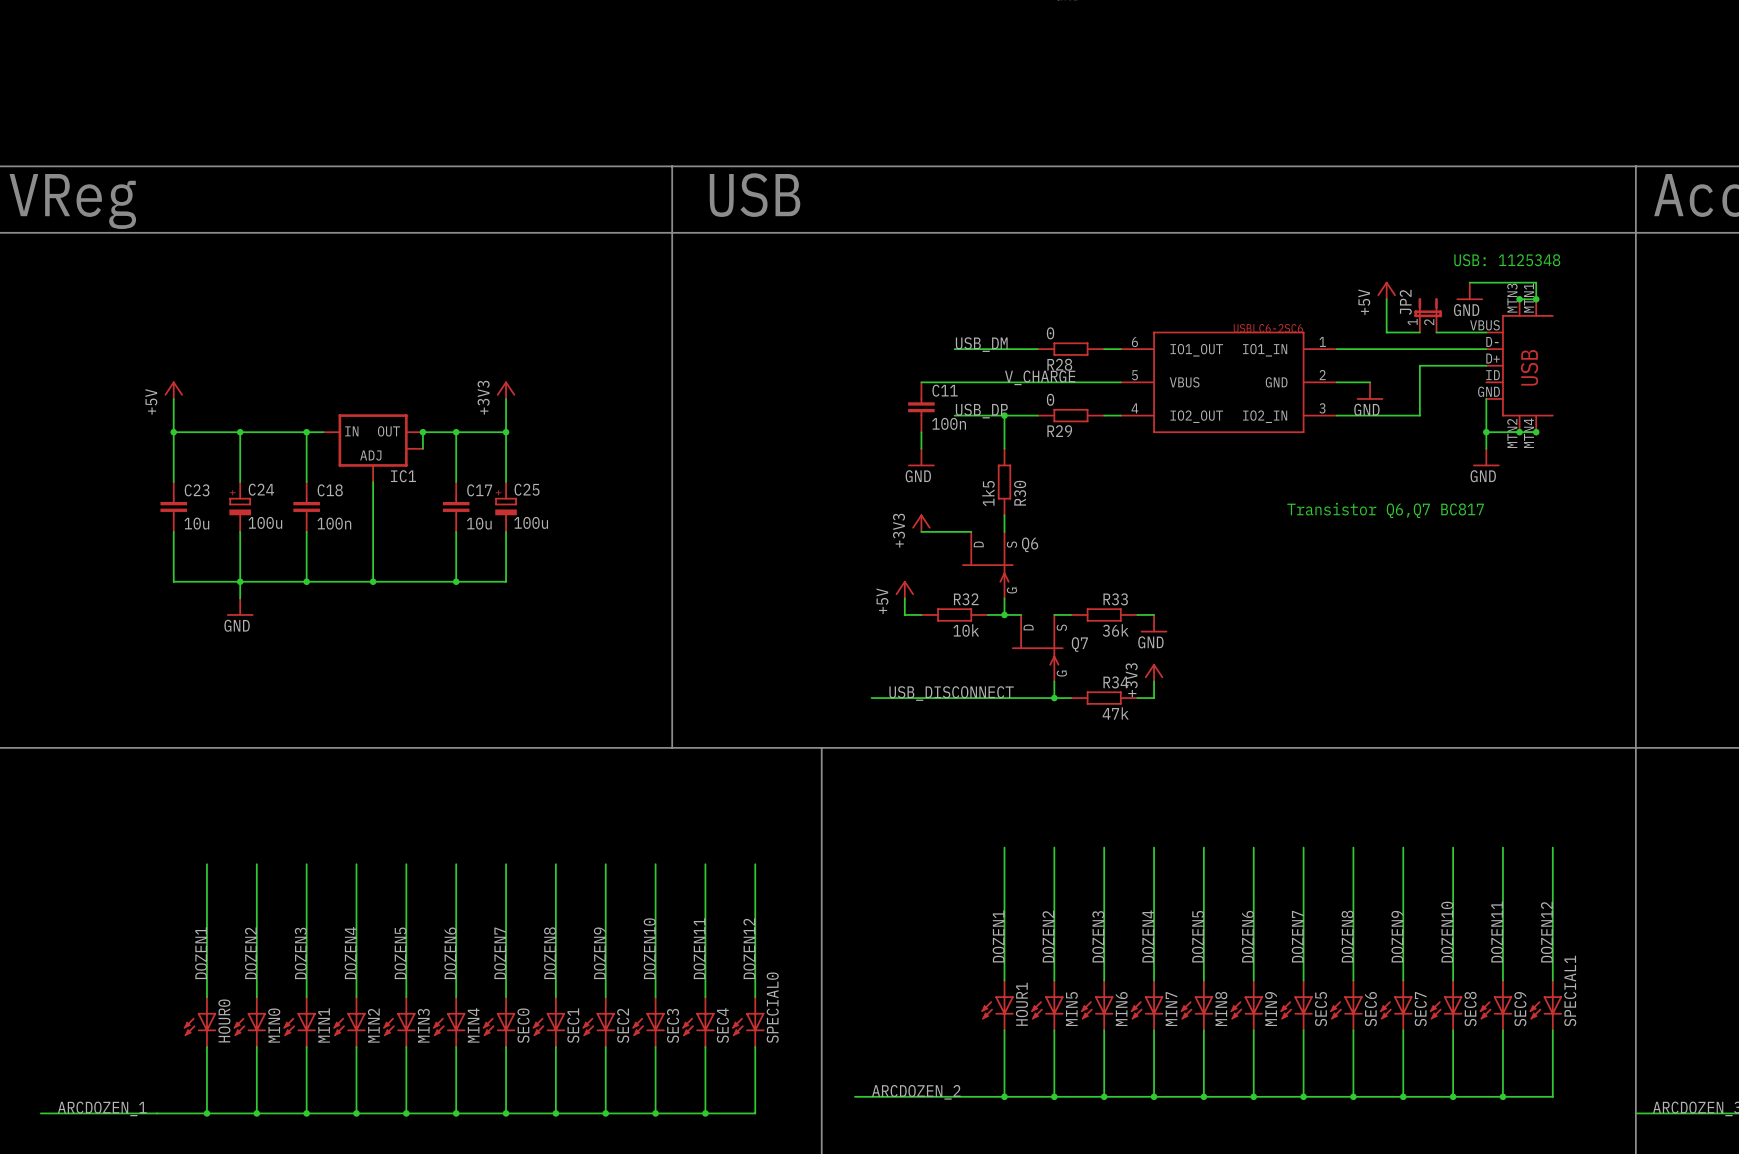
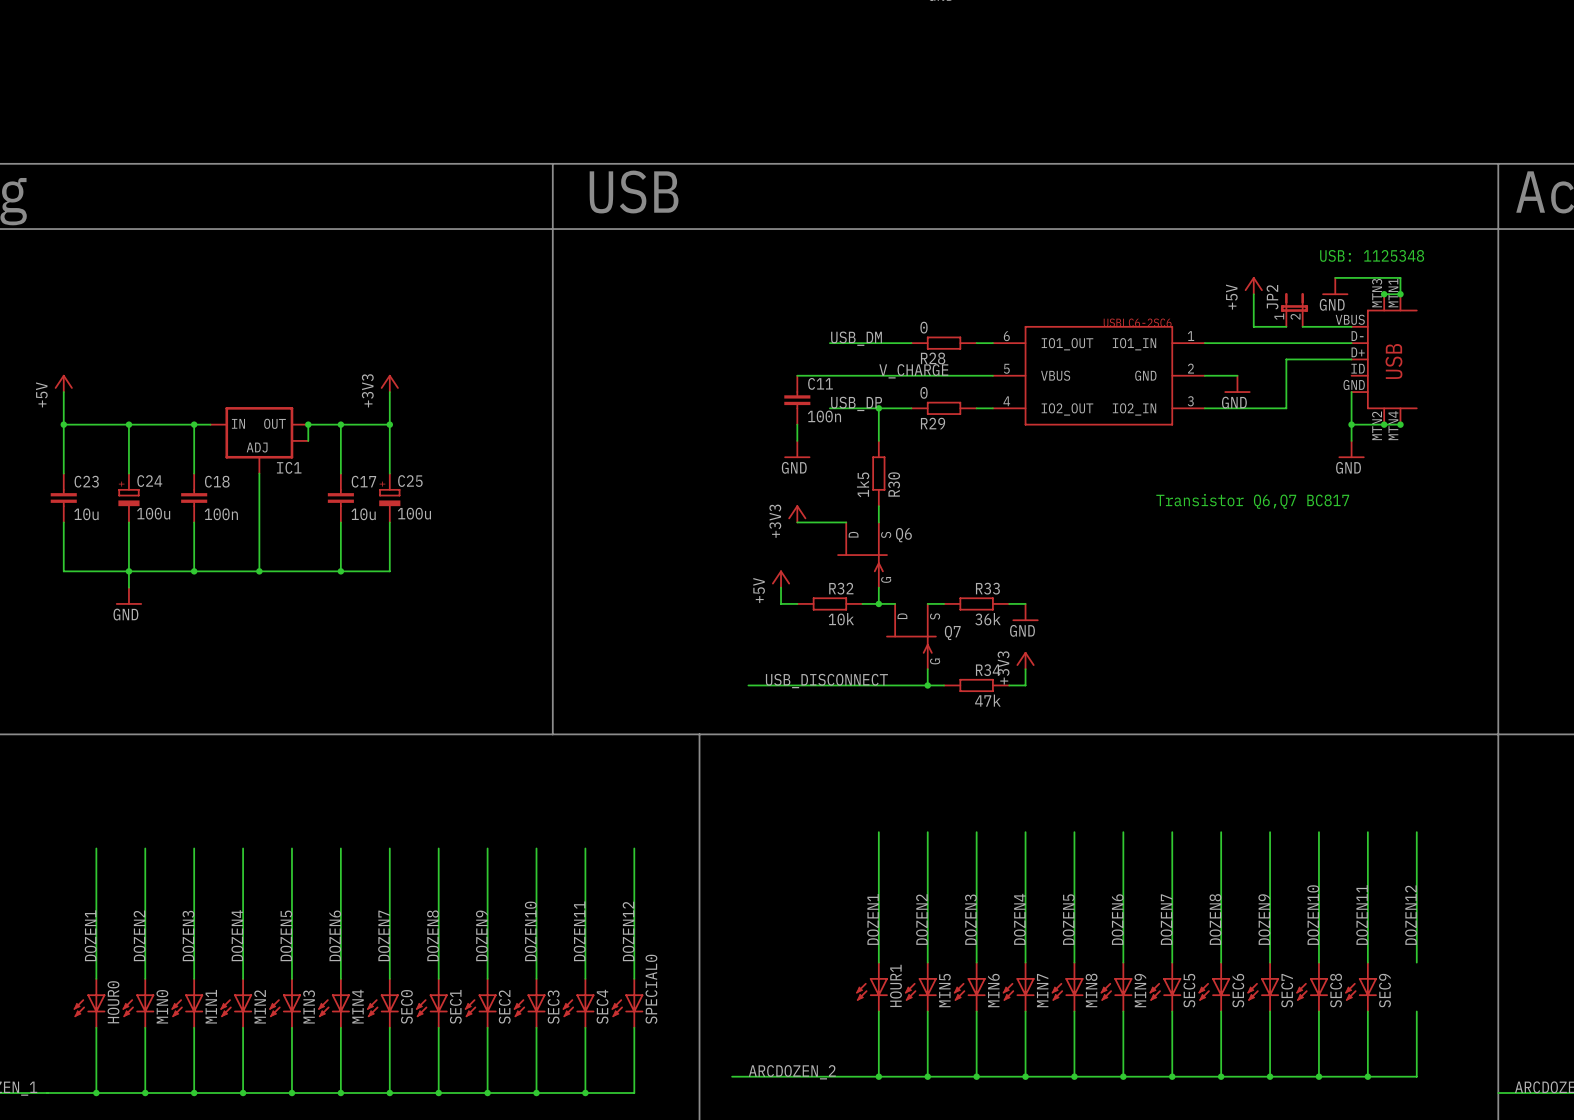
SPECIAL1: (1545, 1005) -> none

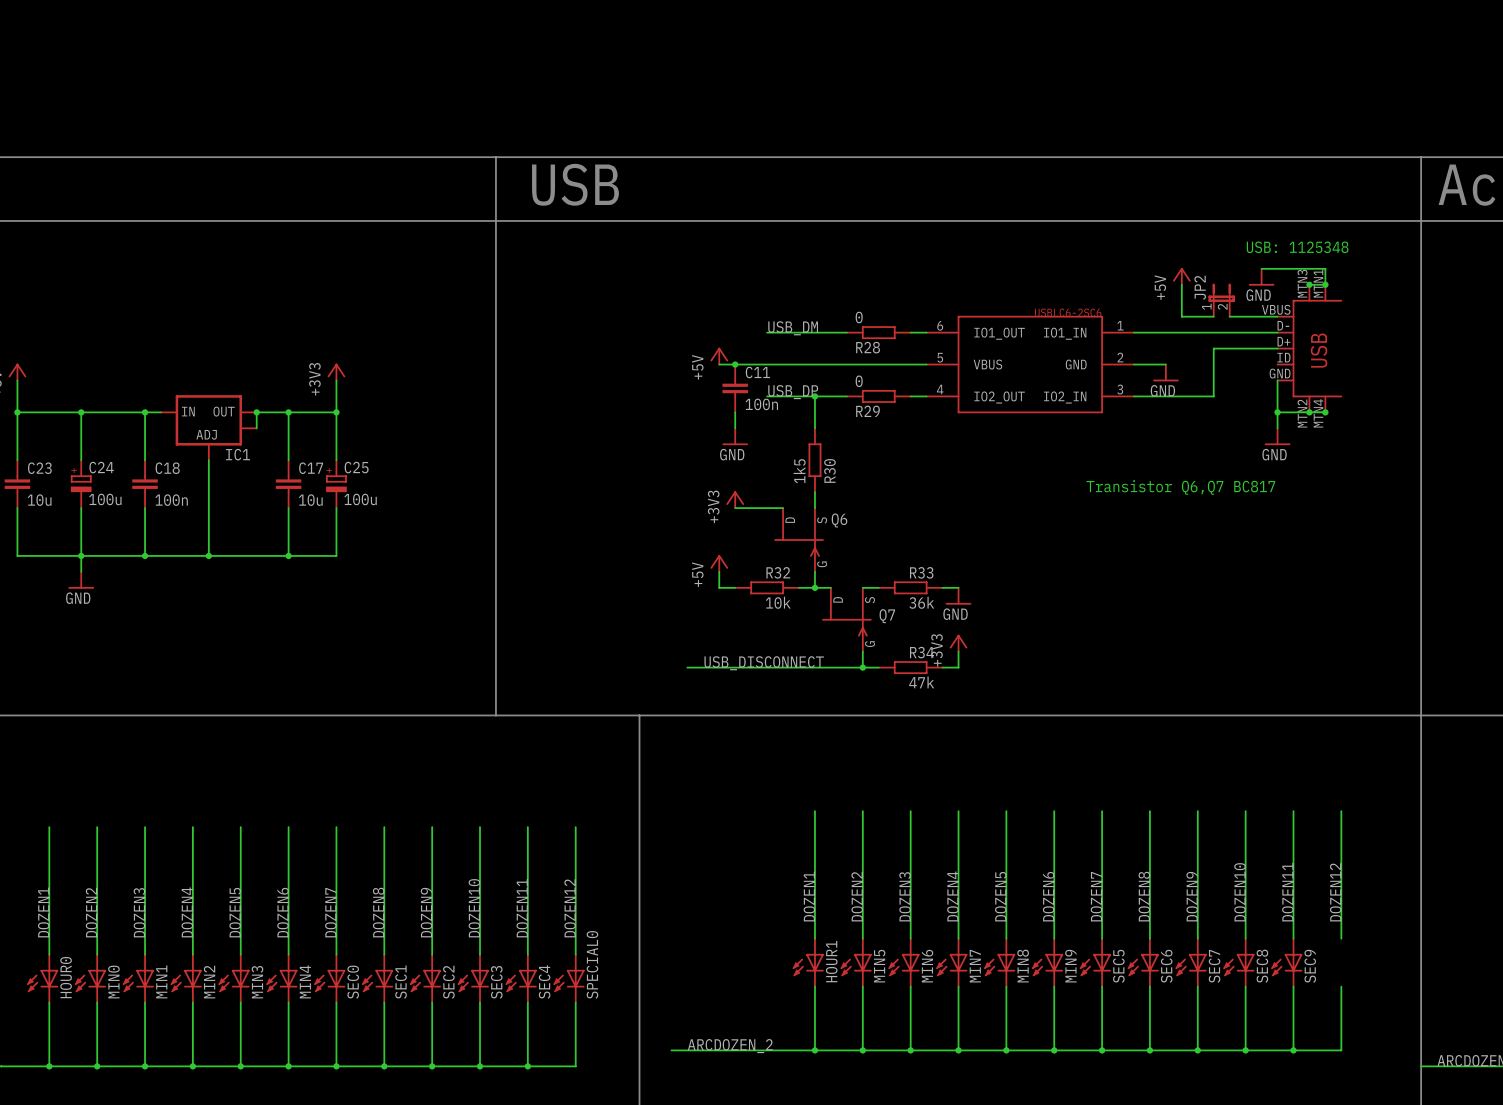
power symbol: none -> +5V (719, 356)
label: V_CHARGE (913, 371) -> none
wire: none -> (719, 364) (735, 364)
junction: none -> (735, 364)

